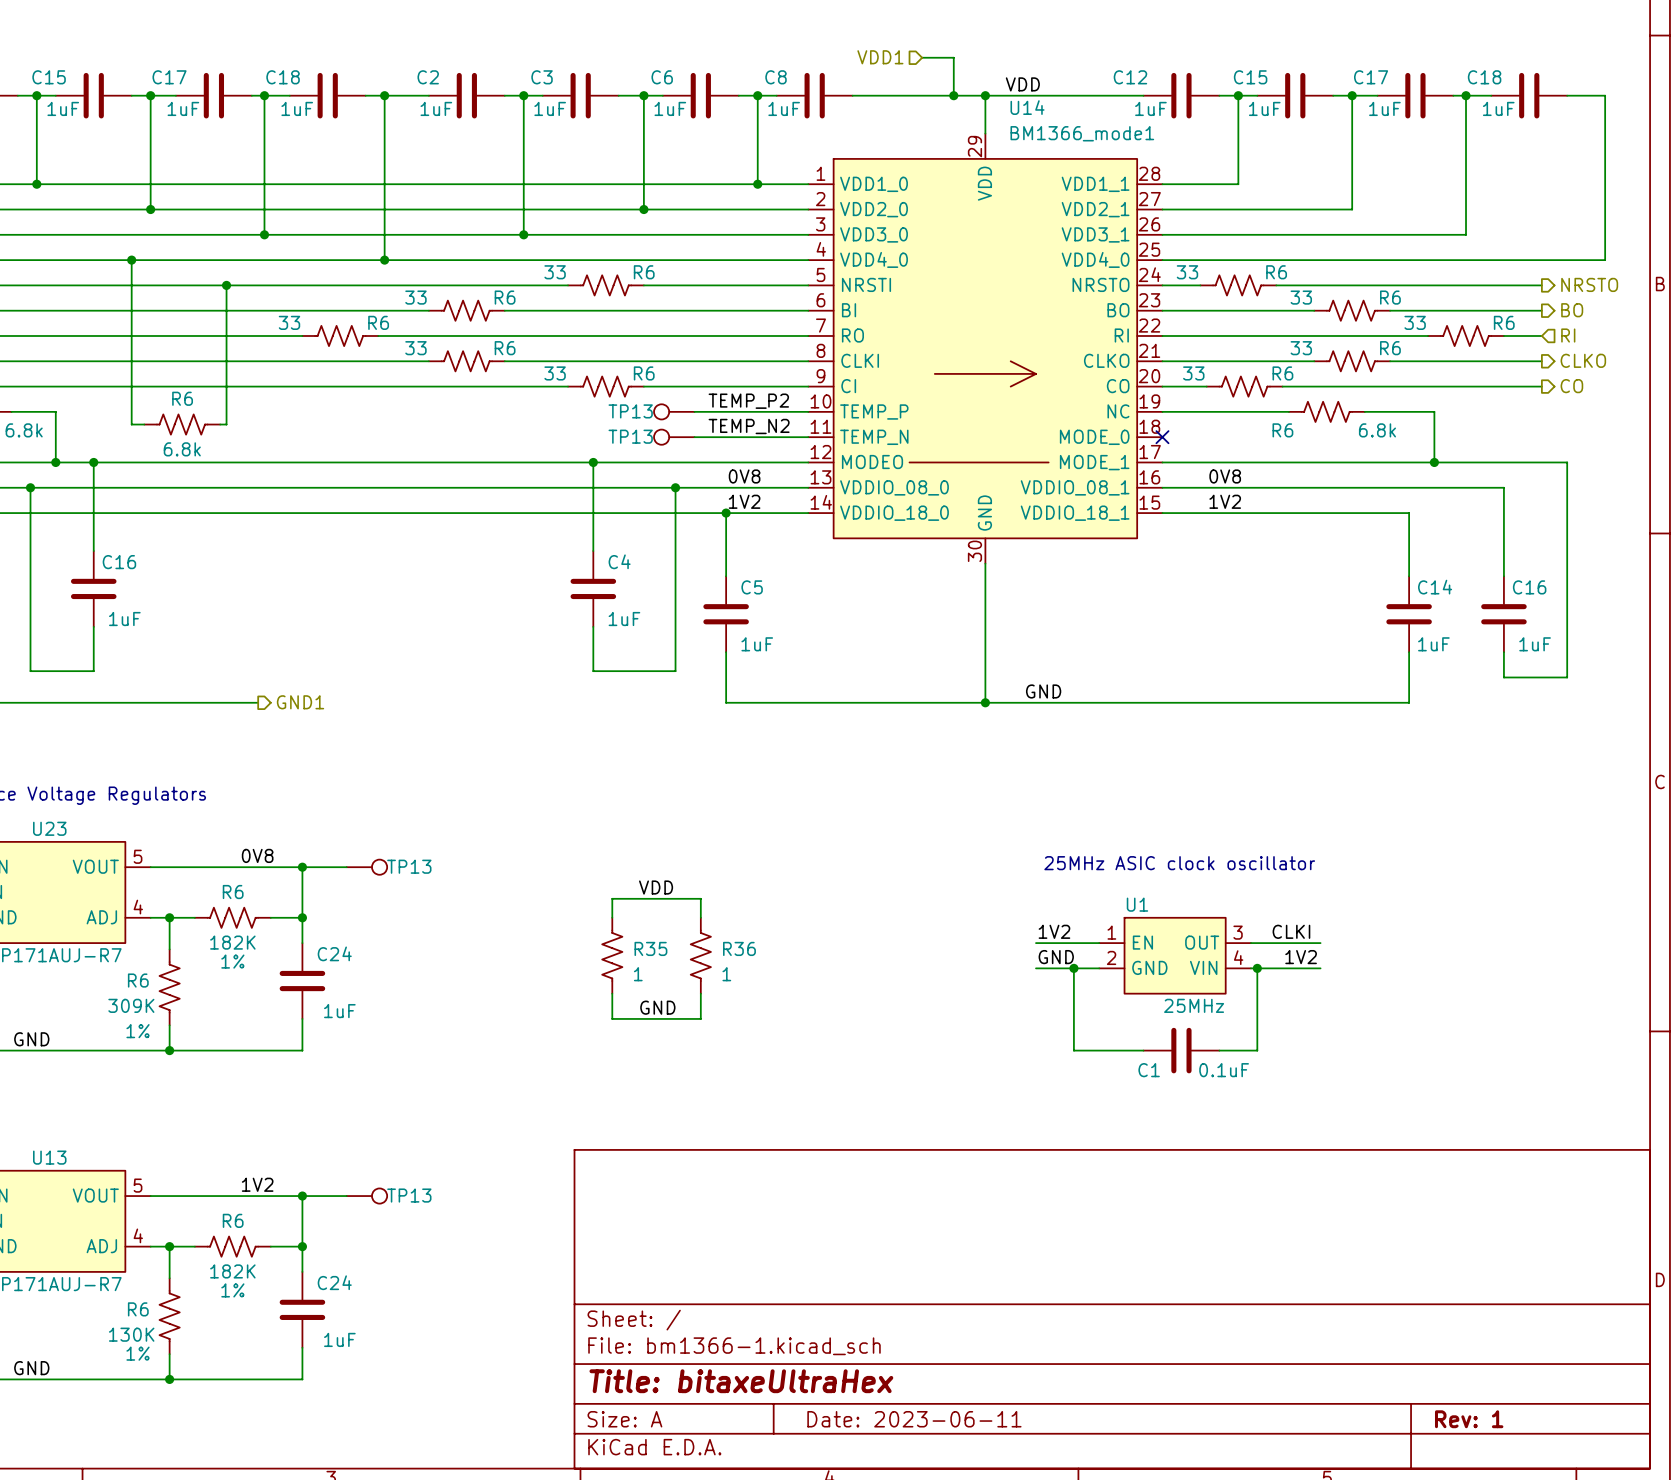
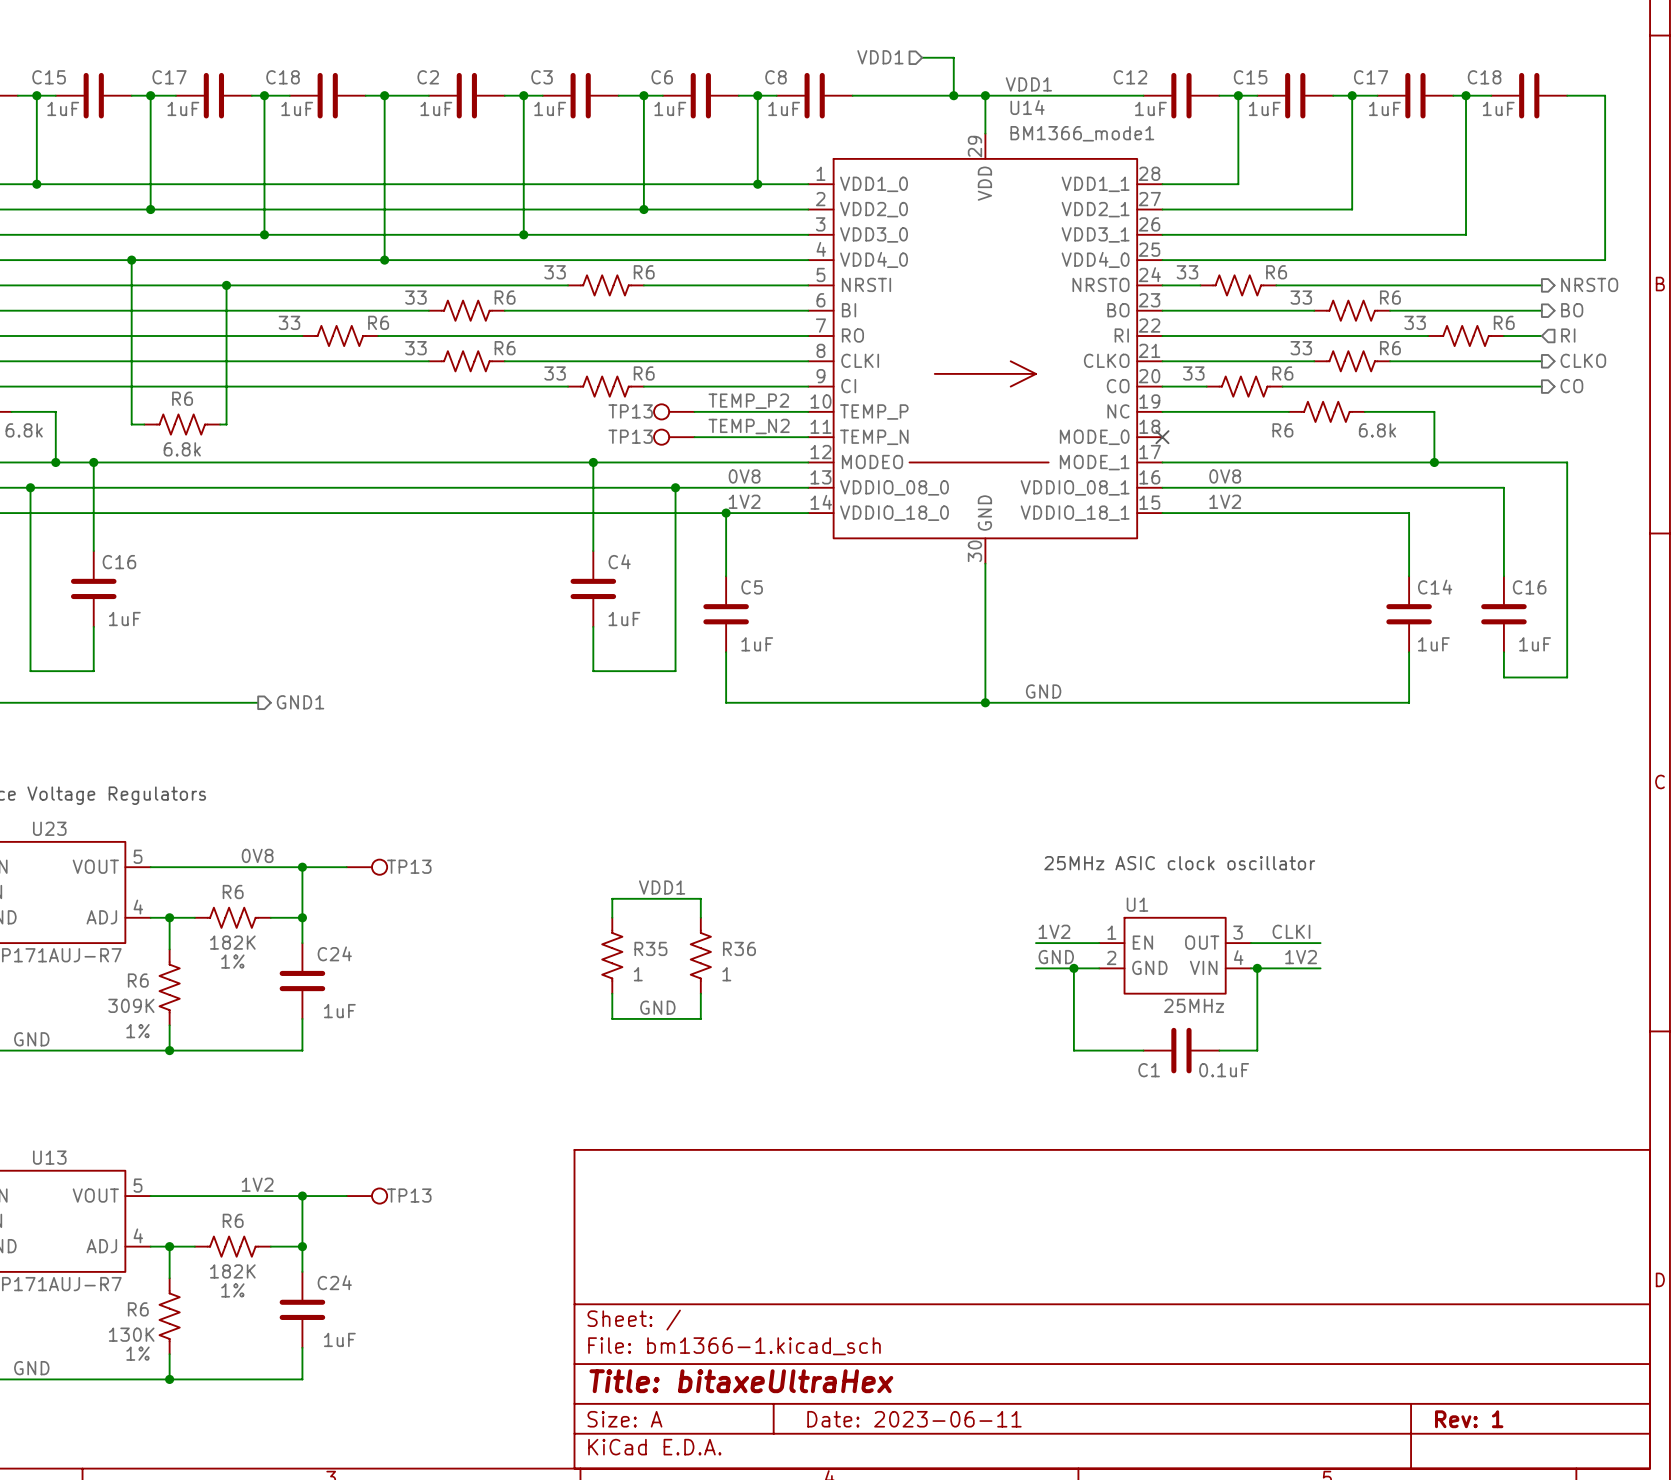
label: VDD (1022, 84) -> VDD1 (1028, 84)
label: VDD (656, 887) -> VDD1 (662, 887)

